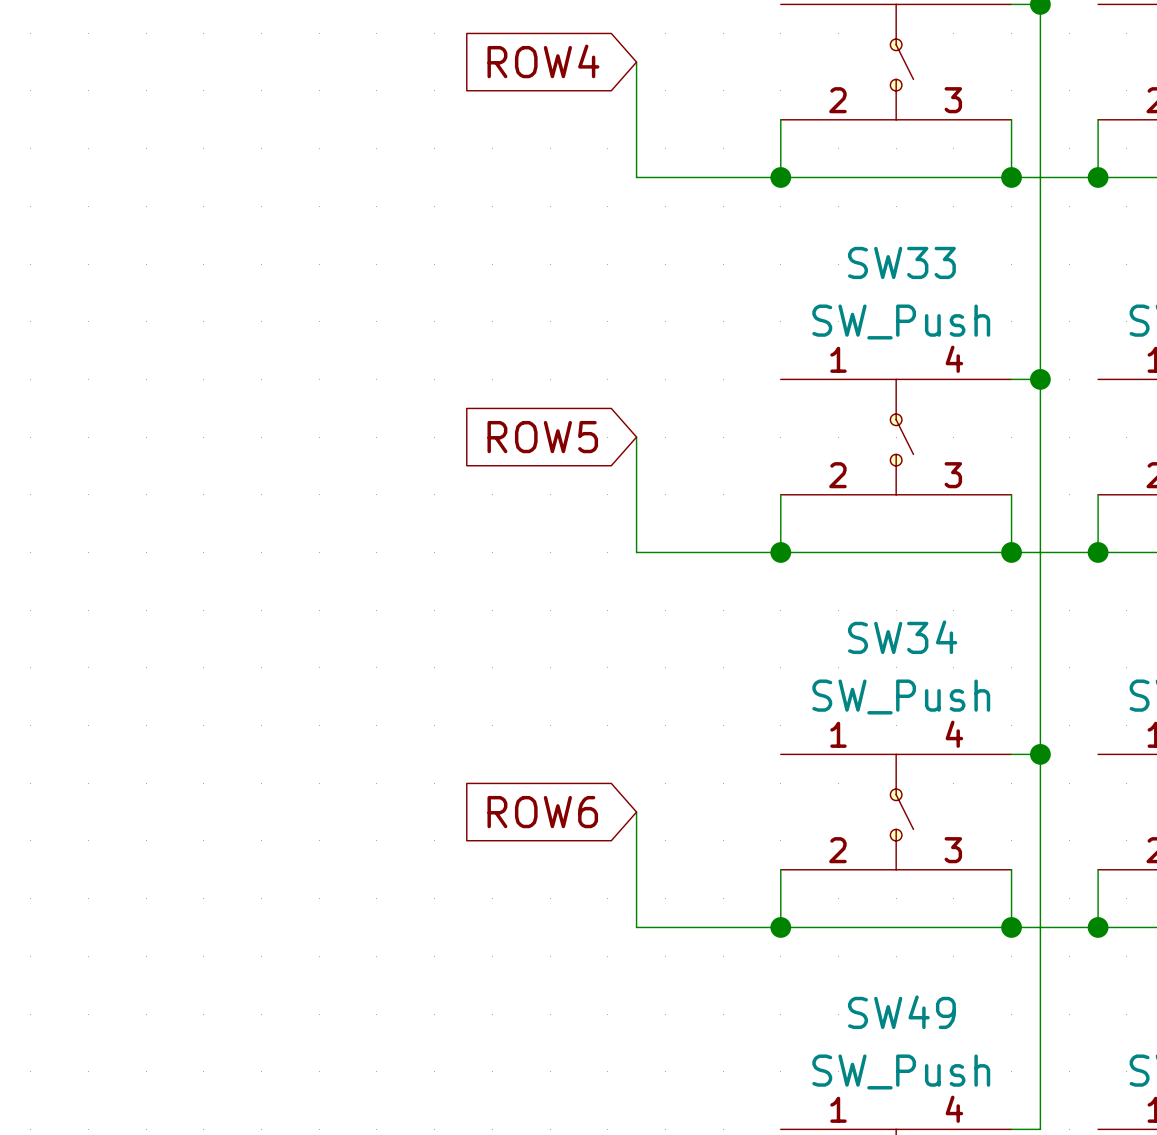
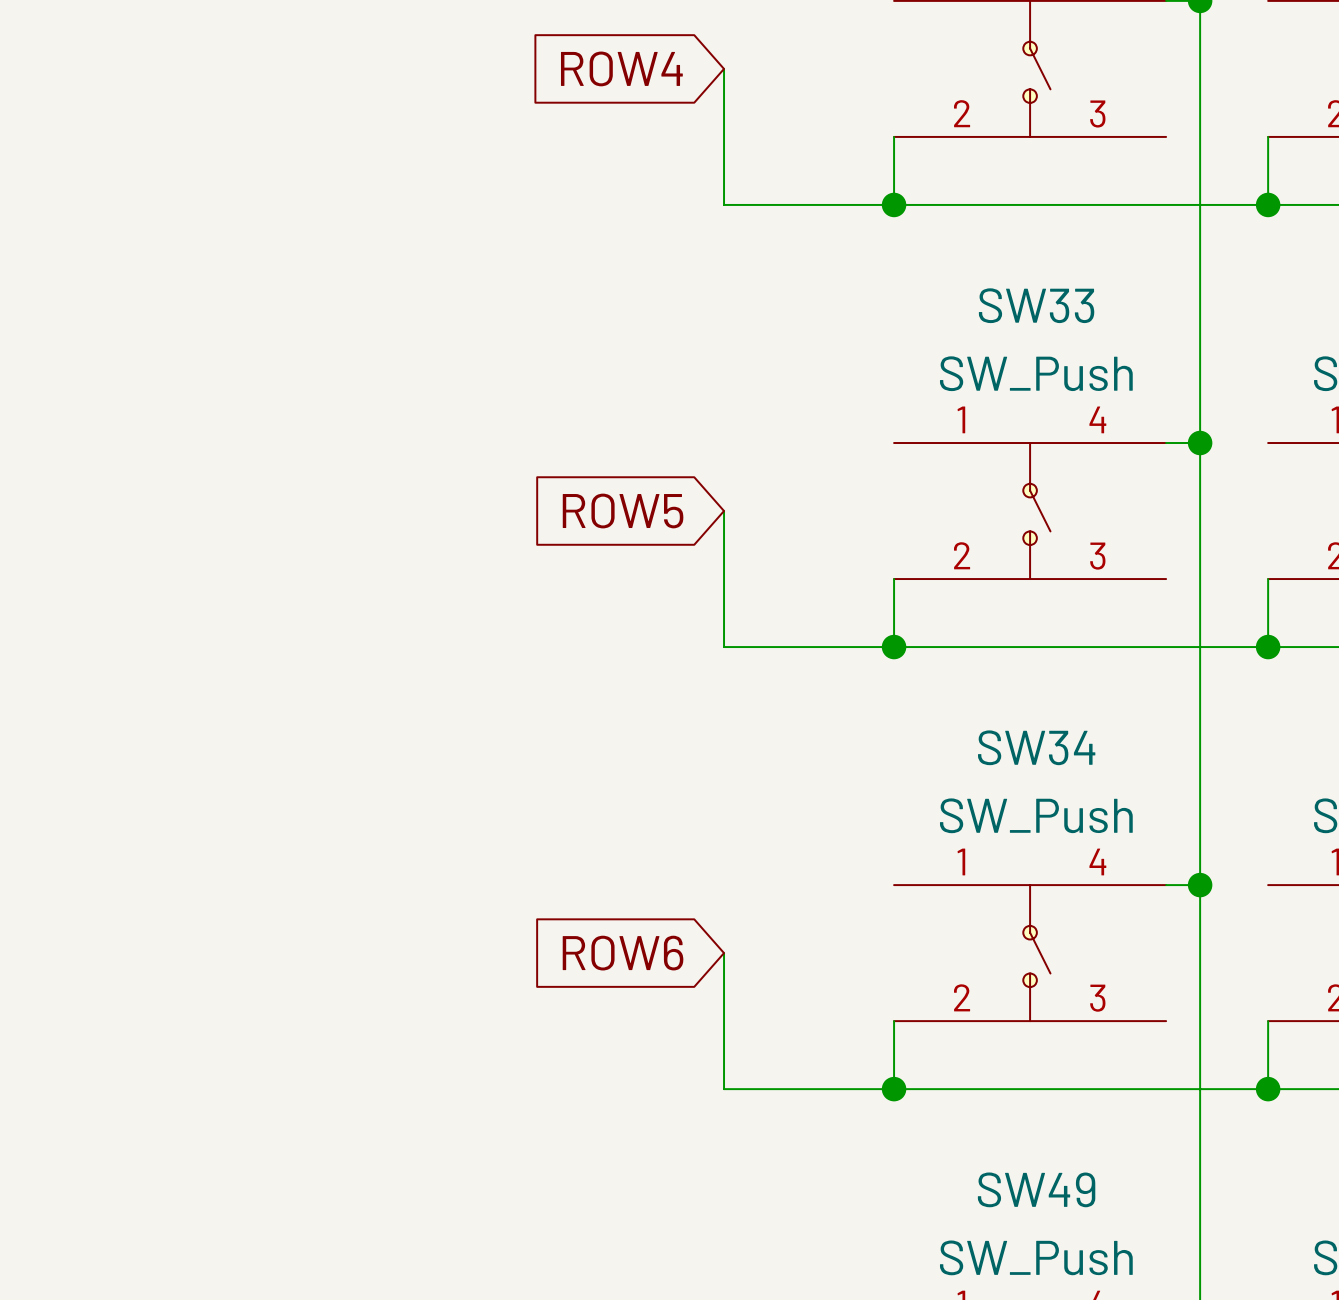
wire: (1011, 119) (1011, 177) -> none
junction: (1011, 177) -> none
wire: (1011, 494) (1011, 552) -> none
junction: (1011, 552) -> none
wire: (1011, 869) (1011, 927) -> none
junction: (1011, 927) -> none

